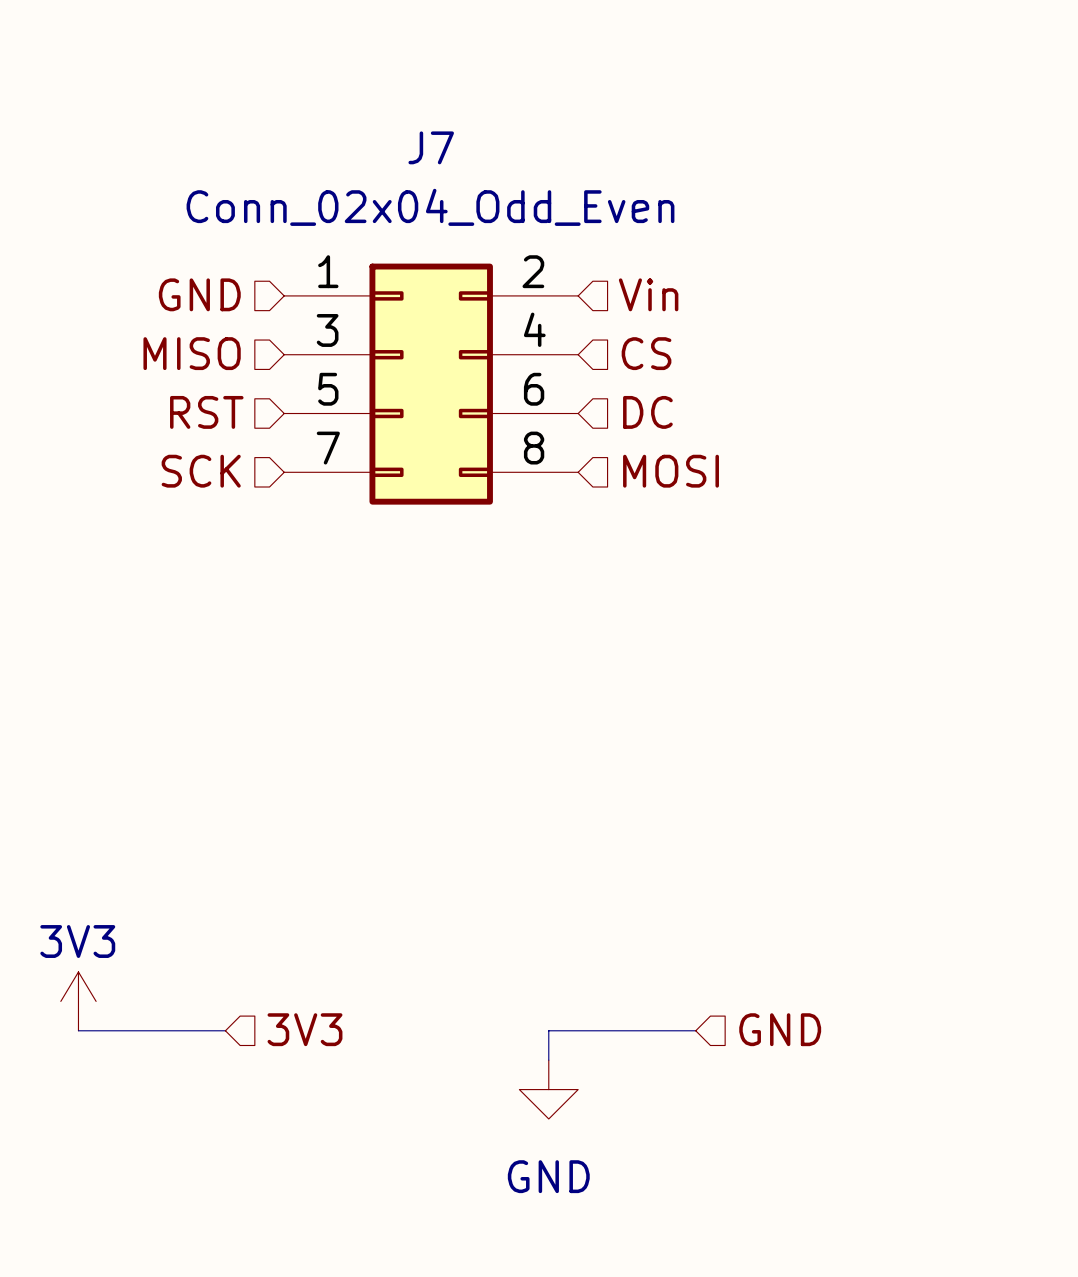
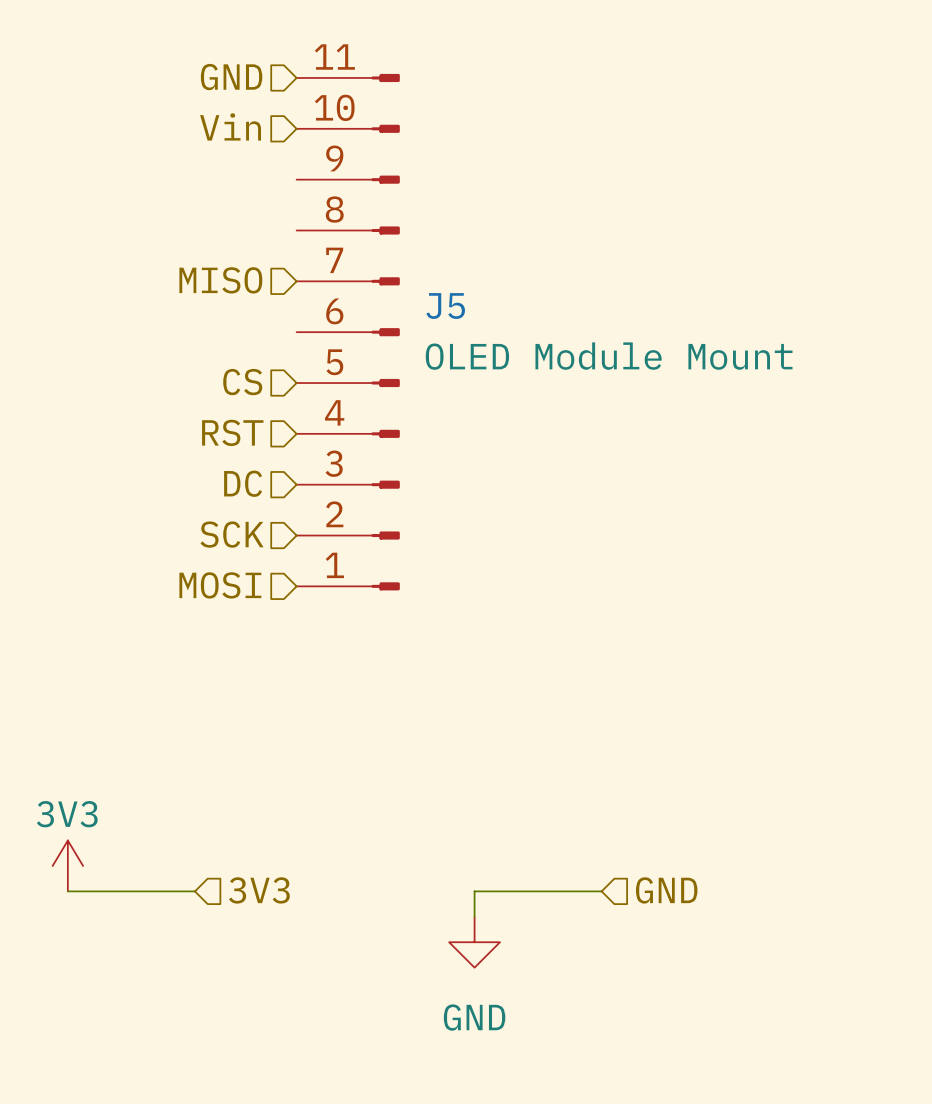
hierarchical label position: GND (199, 294) -> GND (231, 77)
hierarchical label rotation: 0° (648, 294) -> 180° (230, 126)
hierarchical label position: Vin (648, 294) -> Vin (230, 126)
hierarchical label position: MISO (192, 353) -> MISO (220, 280)
hierarchical label rotation: 0° (646, 353) -> 180° (242, 382)
hierarchical label position: CS (646, 353) -> CS (242, 382)
J5: none -> OLED Module Mount (348, 332)
J7: Conn_02x04_Odd_Even (431, 384) -> none
hierarchical label position: RST (206, 412) -> RST (232, 432)
hierarchical label rotation: 0° (647, 412) -> 180° (243, 483)
hierarchical label position: DC (647, 412) -> DC (243, 483)
hierarchical label position: SCK (201, 471) -> SCK (231, 534)
hierarchical label rotation: 0° (671, 471) -> 180° (220, 585)
hierarchical label position: MOSI (671, 471) -> MOSI (220, 585)

